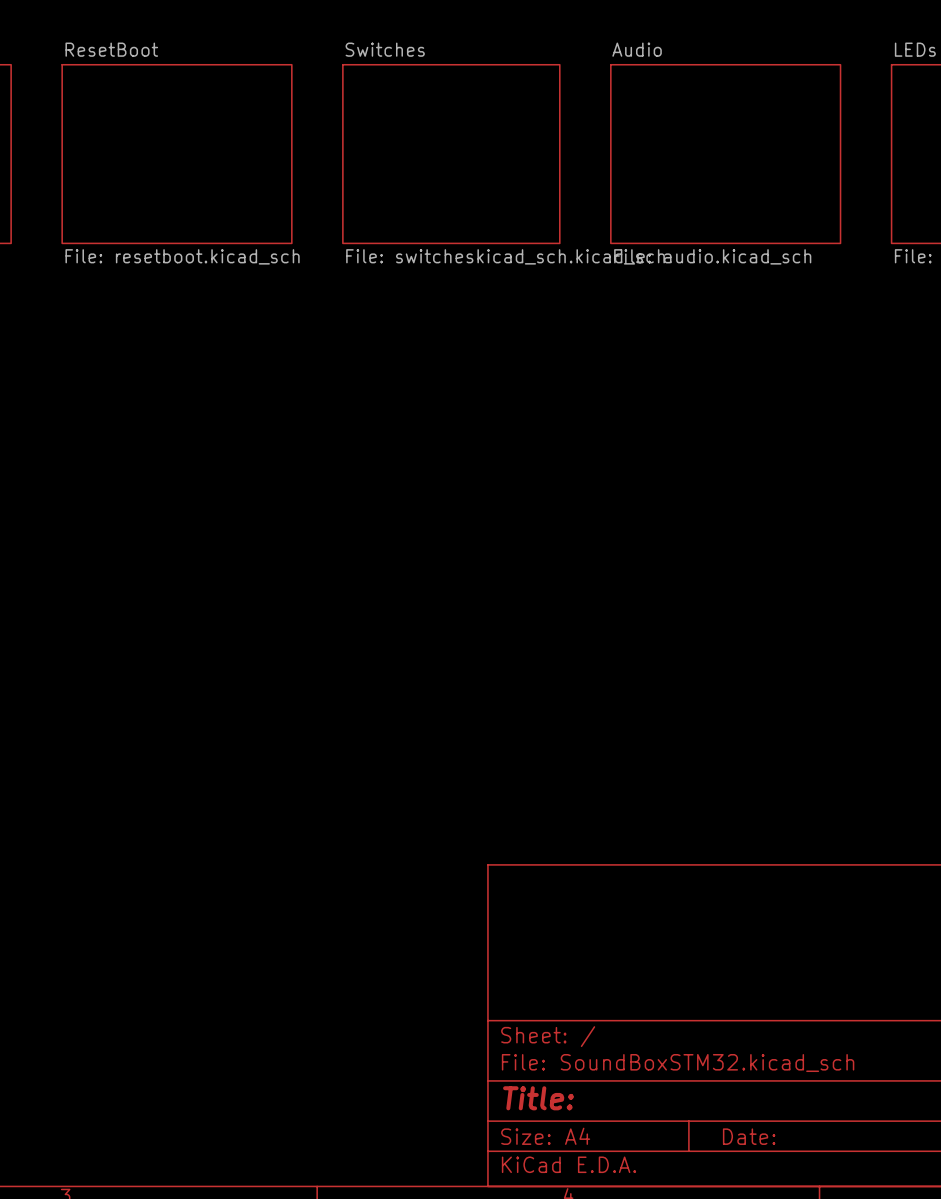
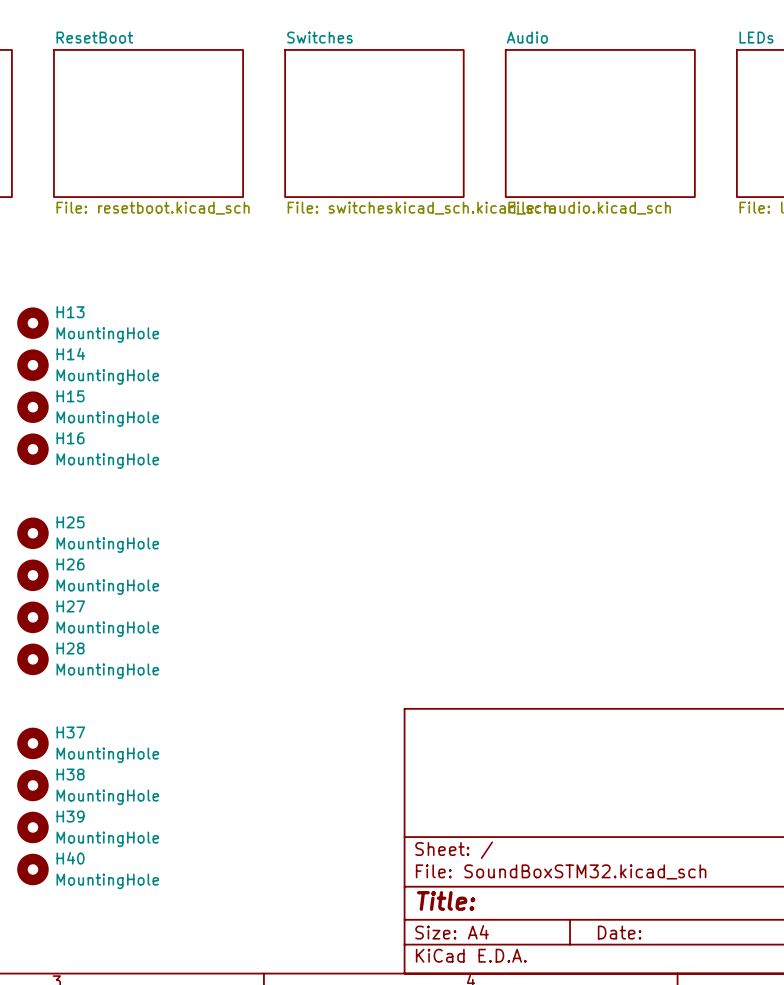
H13: none -> MountingHole (32, 323)
H14: none -> MountingHole (32, 365)
H15: none -> MountingHole (32, 407)
H16: none -> MountingHole (32, 449)
H25: none -> MountingHole (32, 533)
H26: none -> MountingHole (32, 575)
H27: none -> MountingHole (32, 617)
H28: none -> MountingHole (32, 659)
H37: none -> MountingHole (32, 743)
H38: none -> MountingHole (32, 785)
H39: none -> MountingHole (32, 827)
H40: none -> MountingHole (32, 869)

